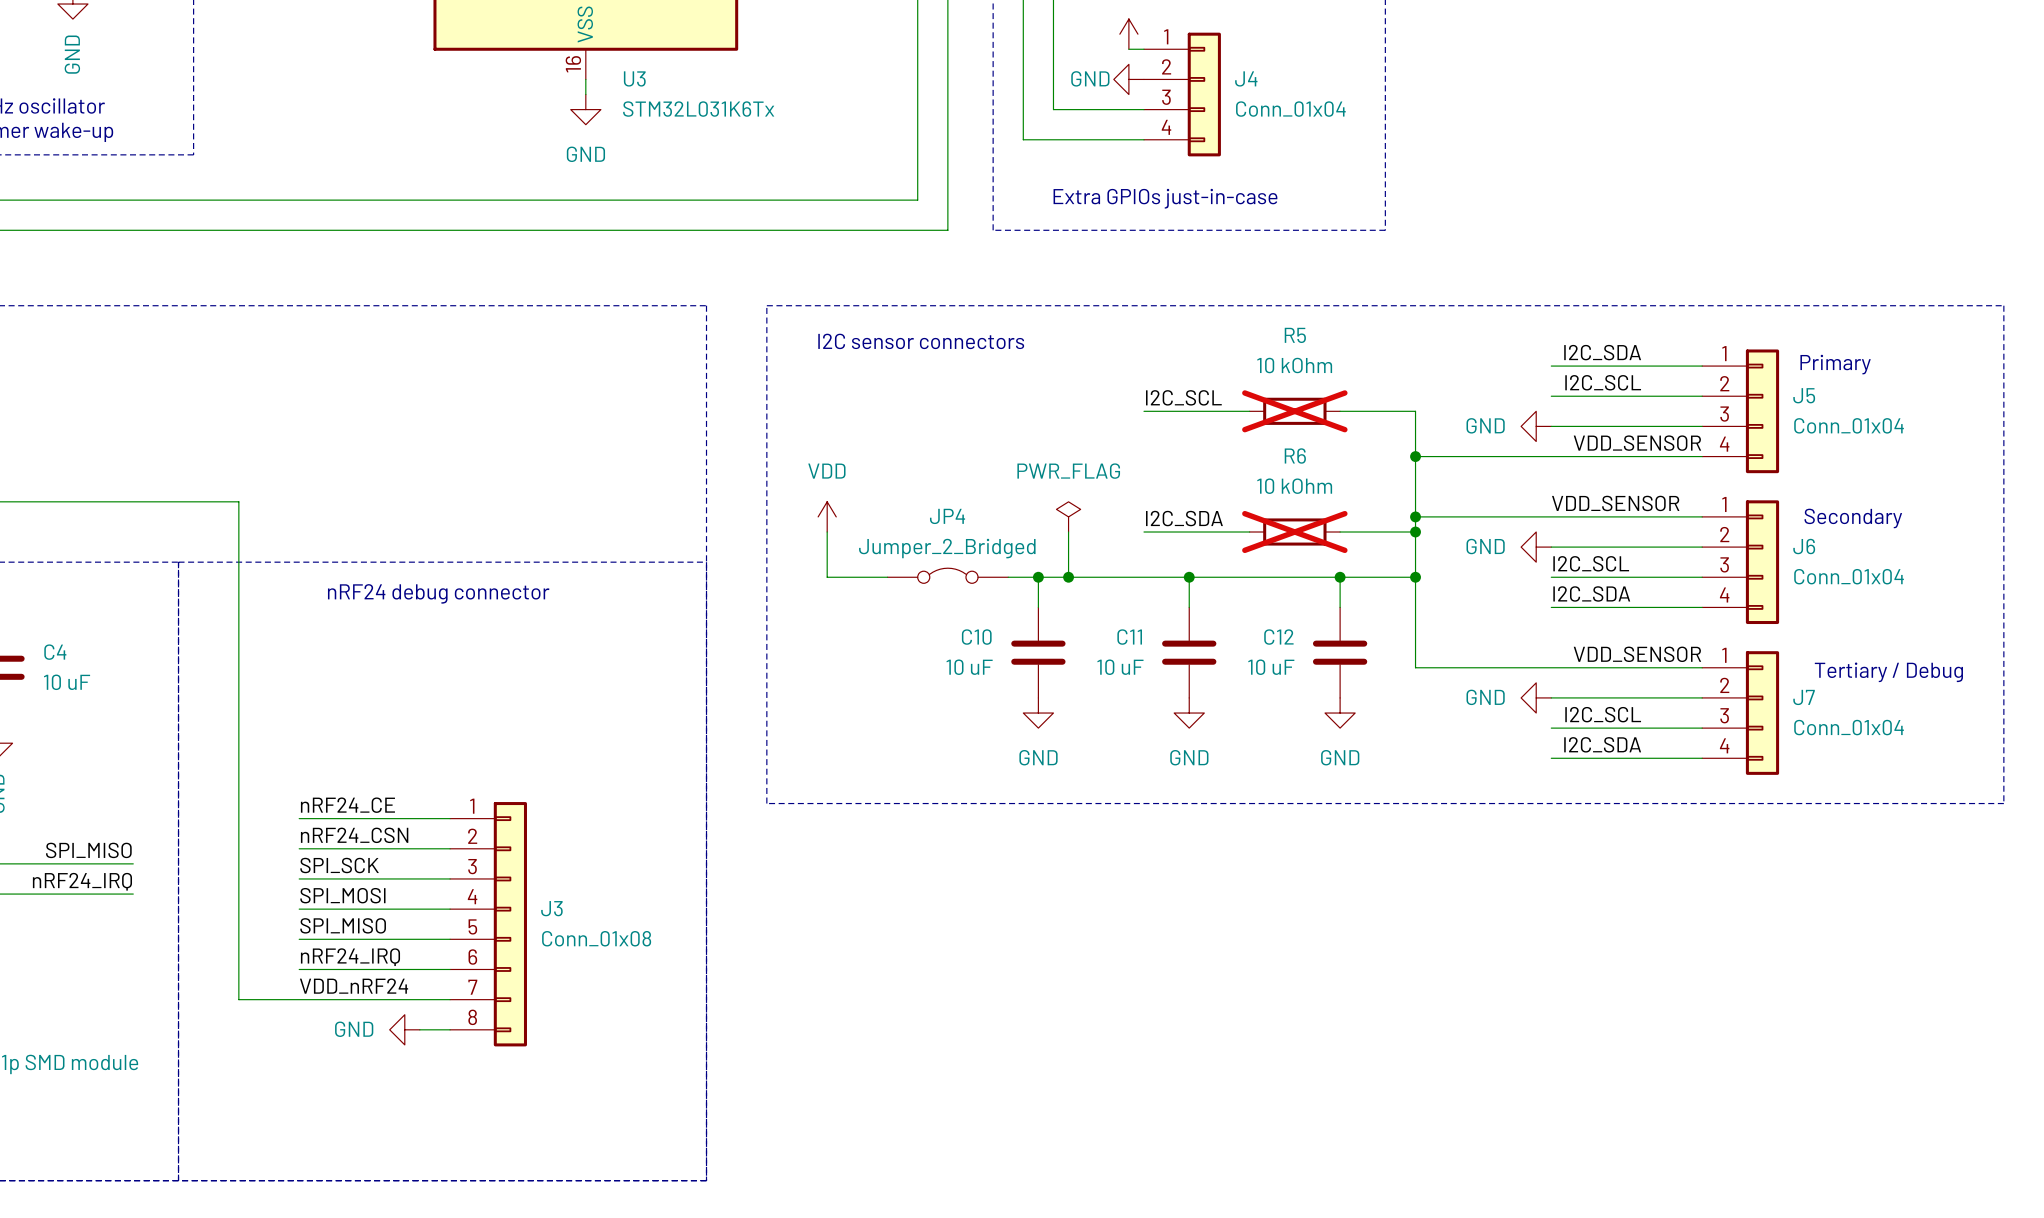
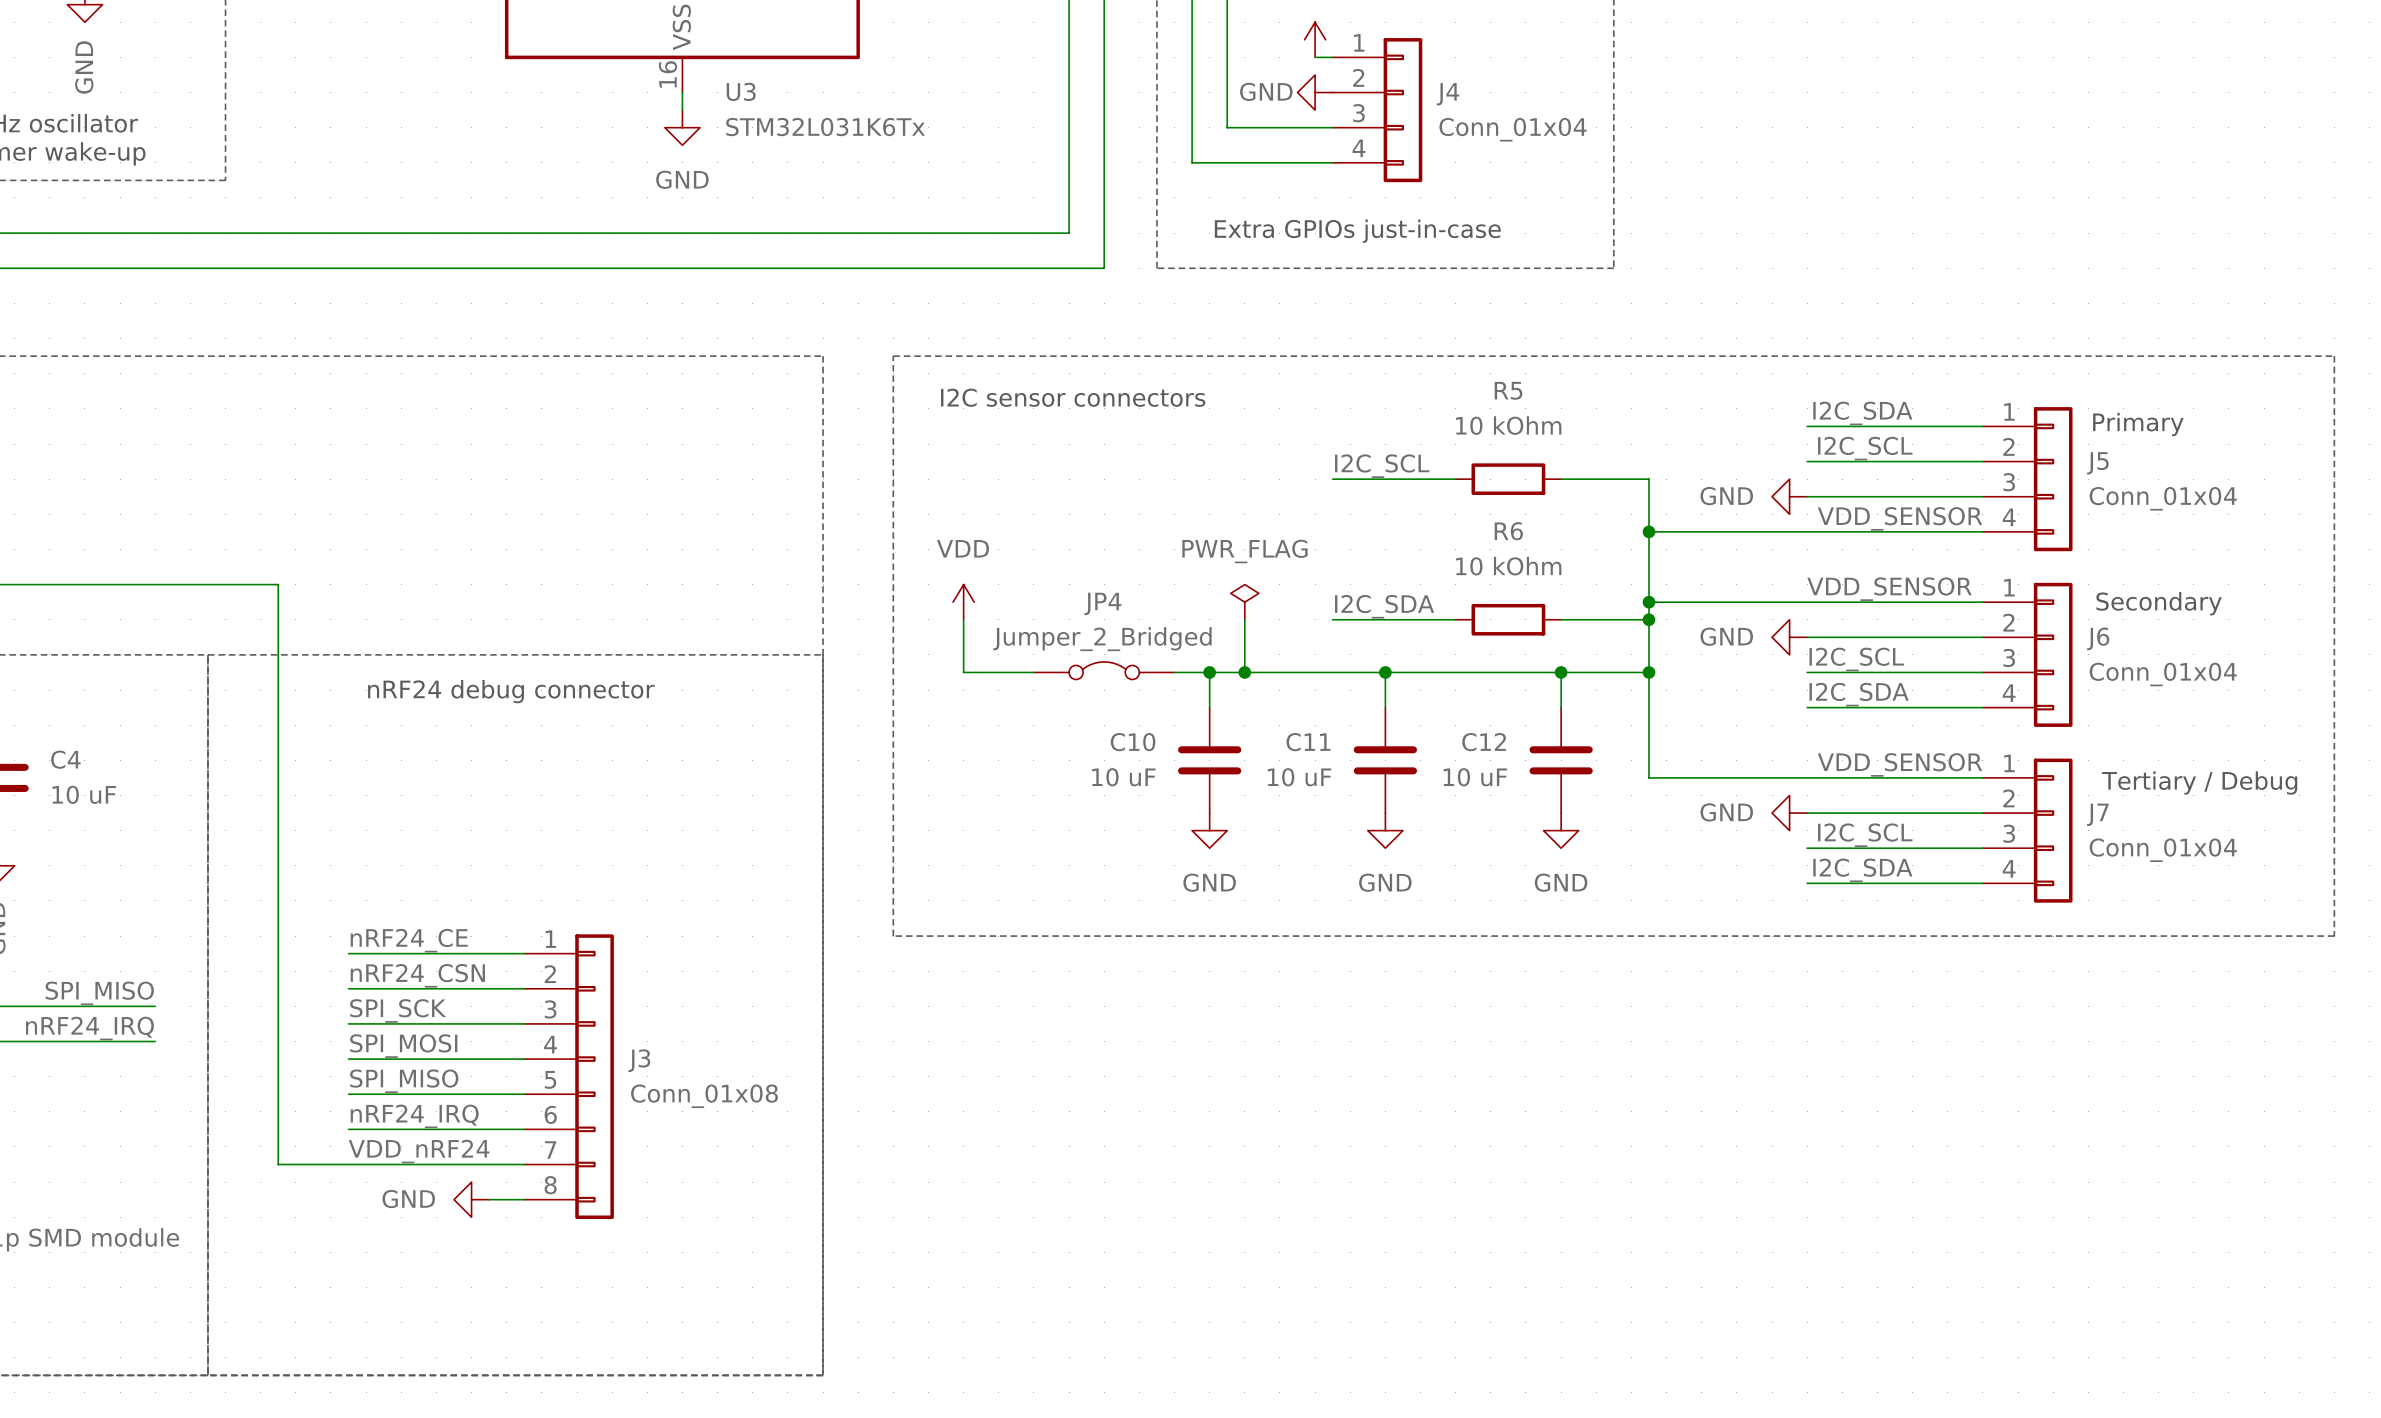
R5 do-not-place cross: (1294, 411) -> none
R6 do-not-place cross: (1294, 532) -> none

